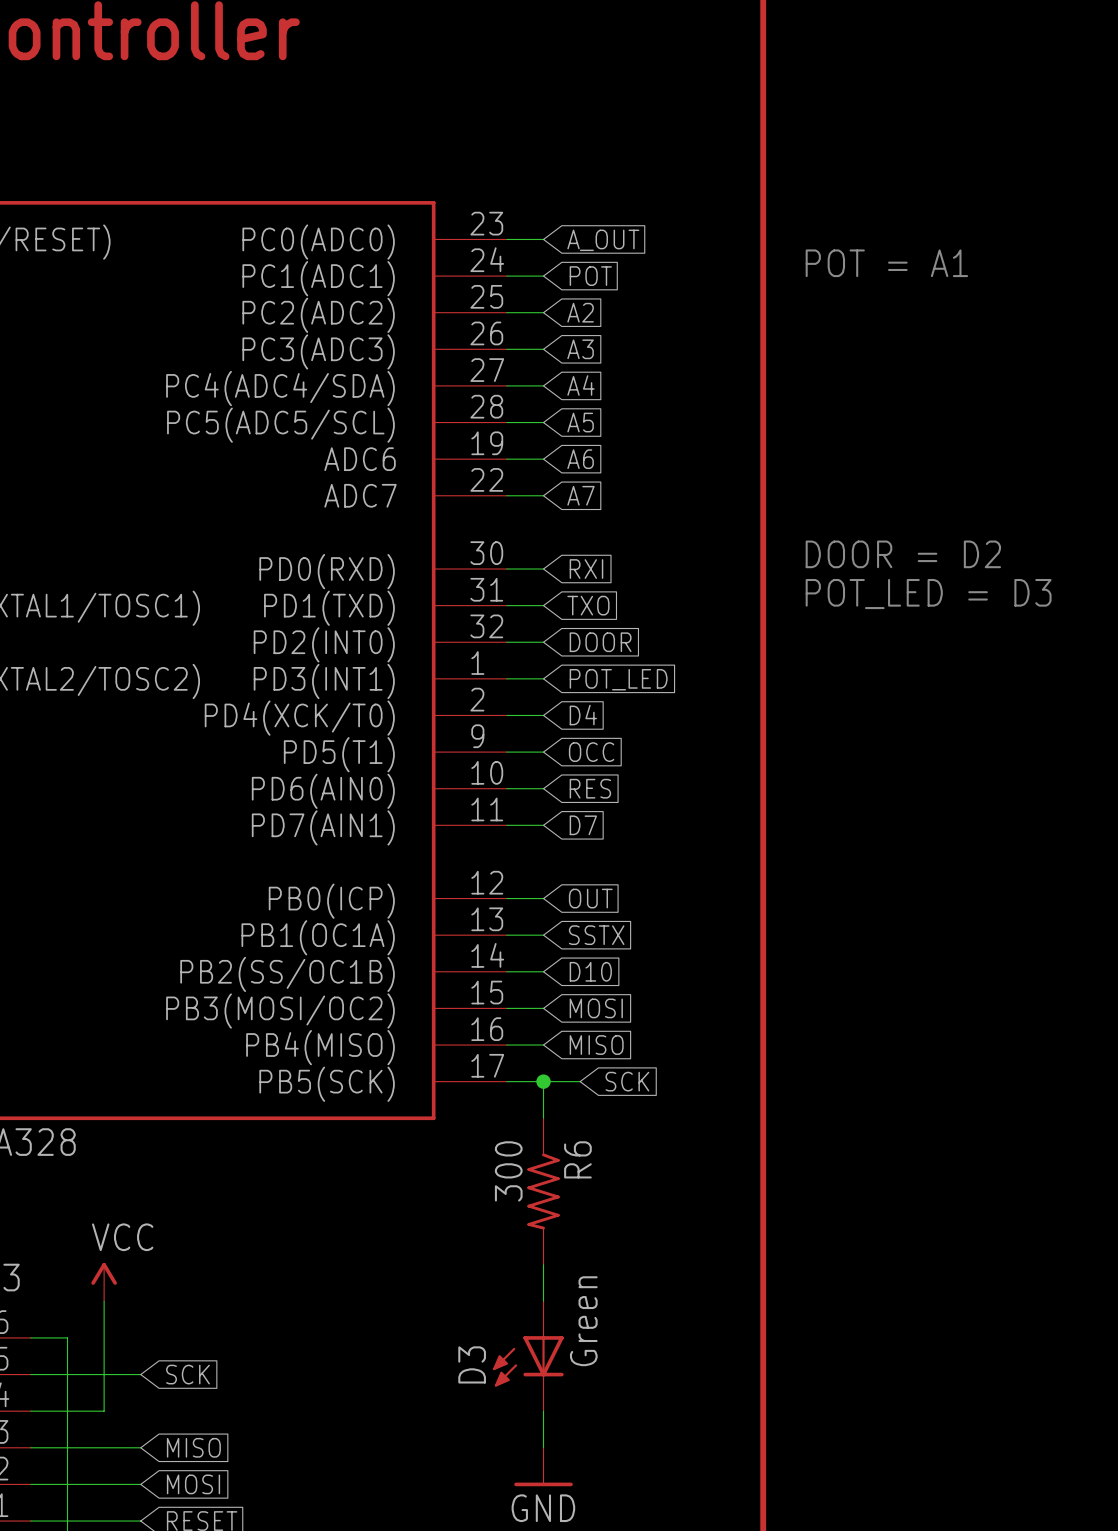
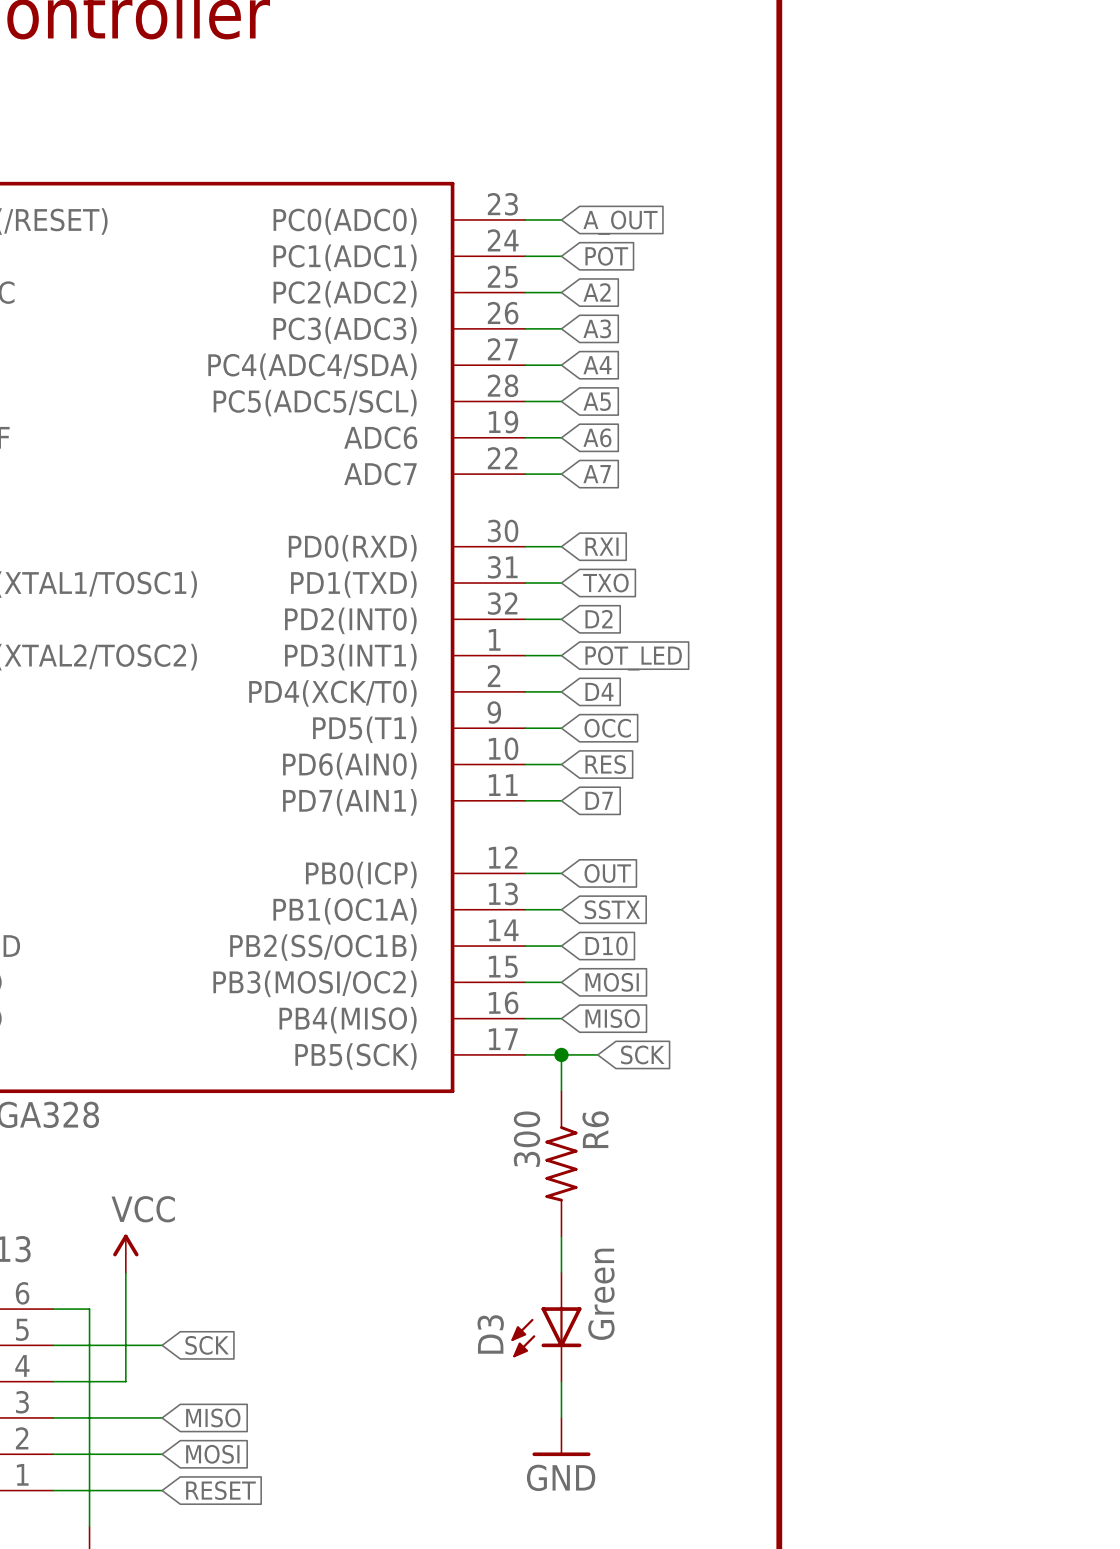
text: POT = A1 (886, 263) -> none
text: DOOR = D2 (903, 554) -> none
text: POT_LED = D3 (928, 594) -> none
global label: DOOR (600, 642) -> D2 (598, 619)

